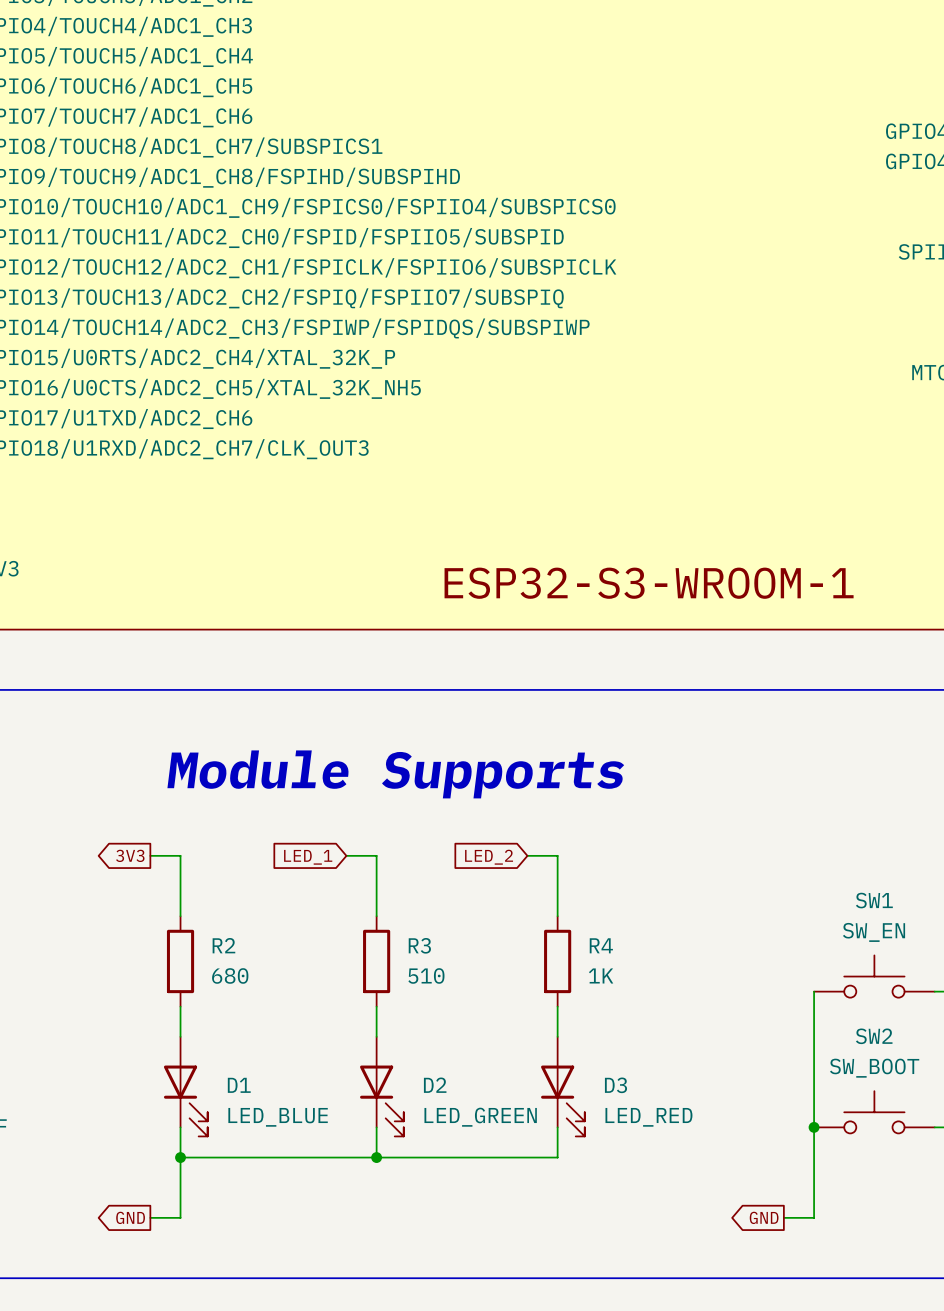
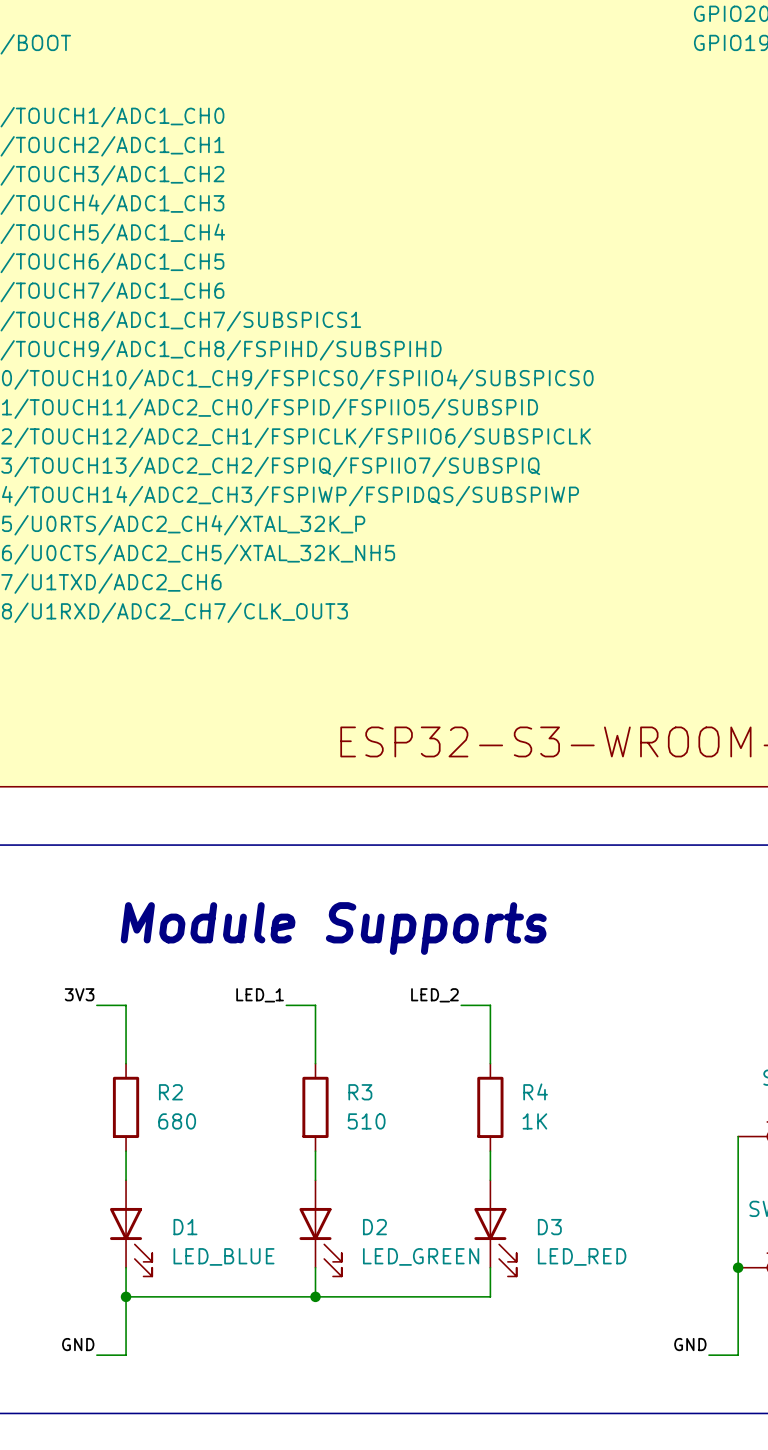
label: none -> 3V3 (79, 994)
label: none -> LED_1 (260, 995)
label: none -> LED_2 (434, 995)
global label: 3V3 (130, 855) -> none
global label: LED_1 (308, 857) -> none
global label: LED_2 (489, 857) -> none
label: none -> GND (78, 1344)
label: none -> GND (690, 1344)
global label: GND (130, 1217) -> none
global label: GND (764, 1217) -> none

